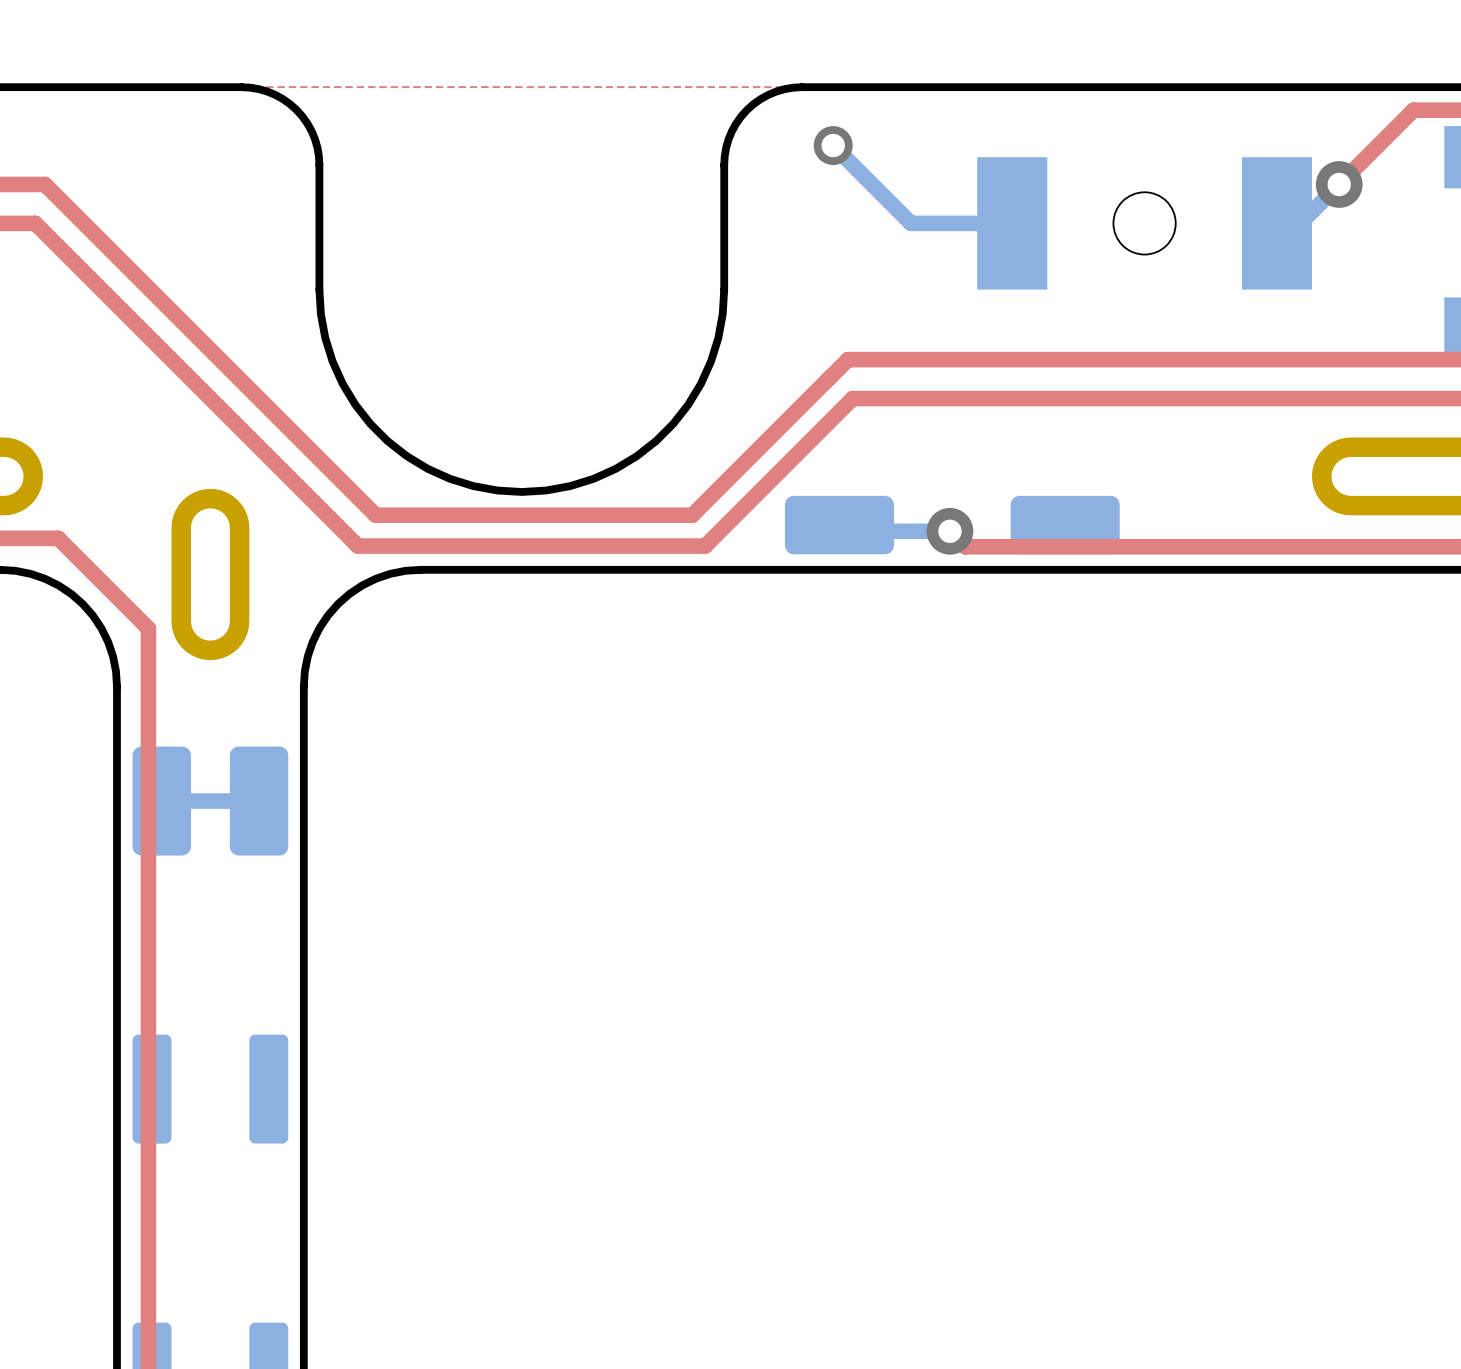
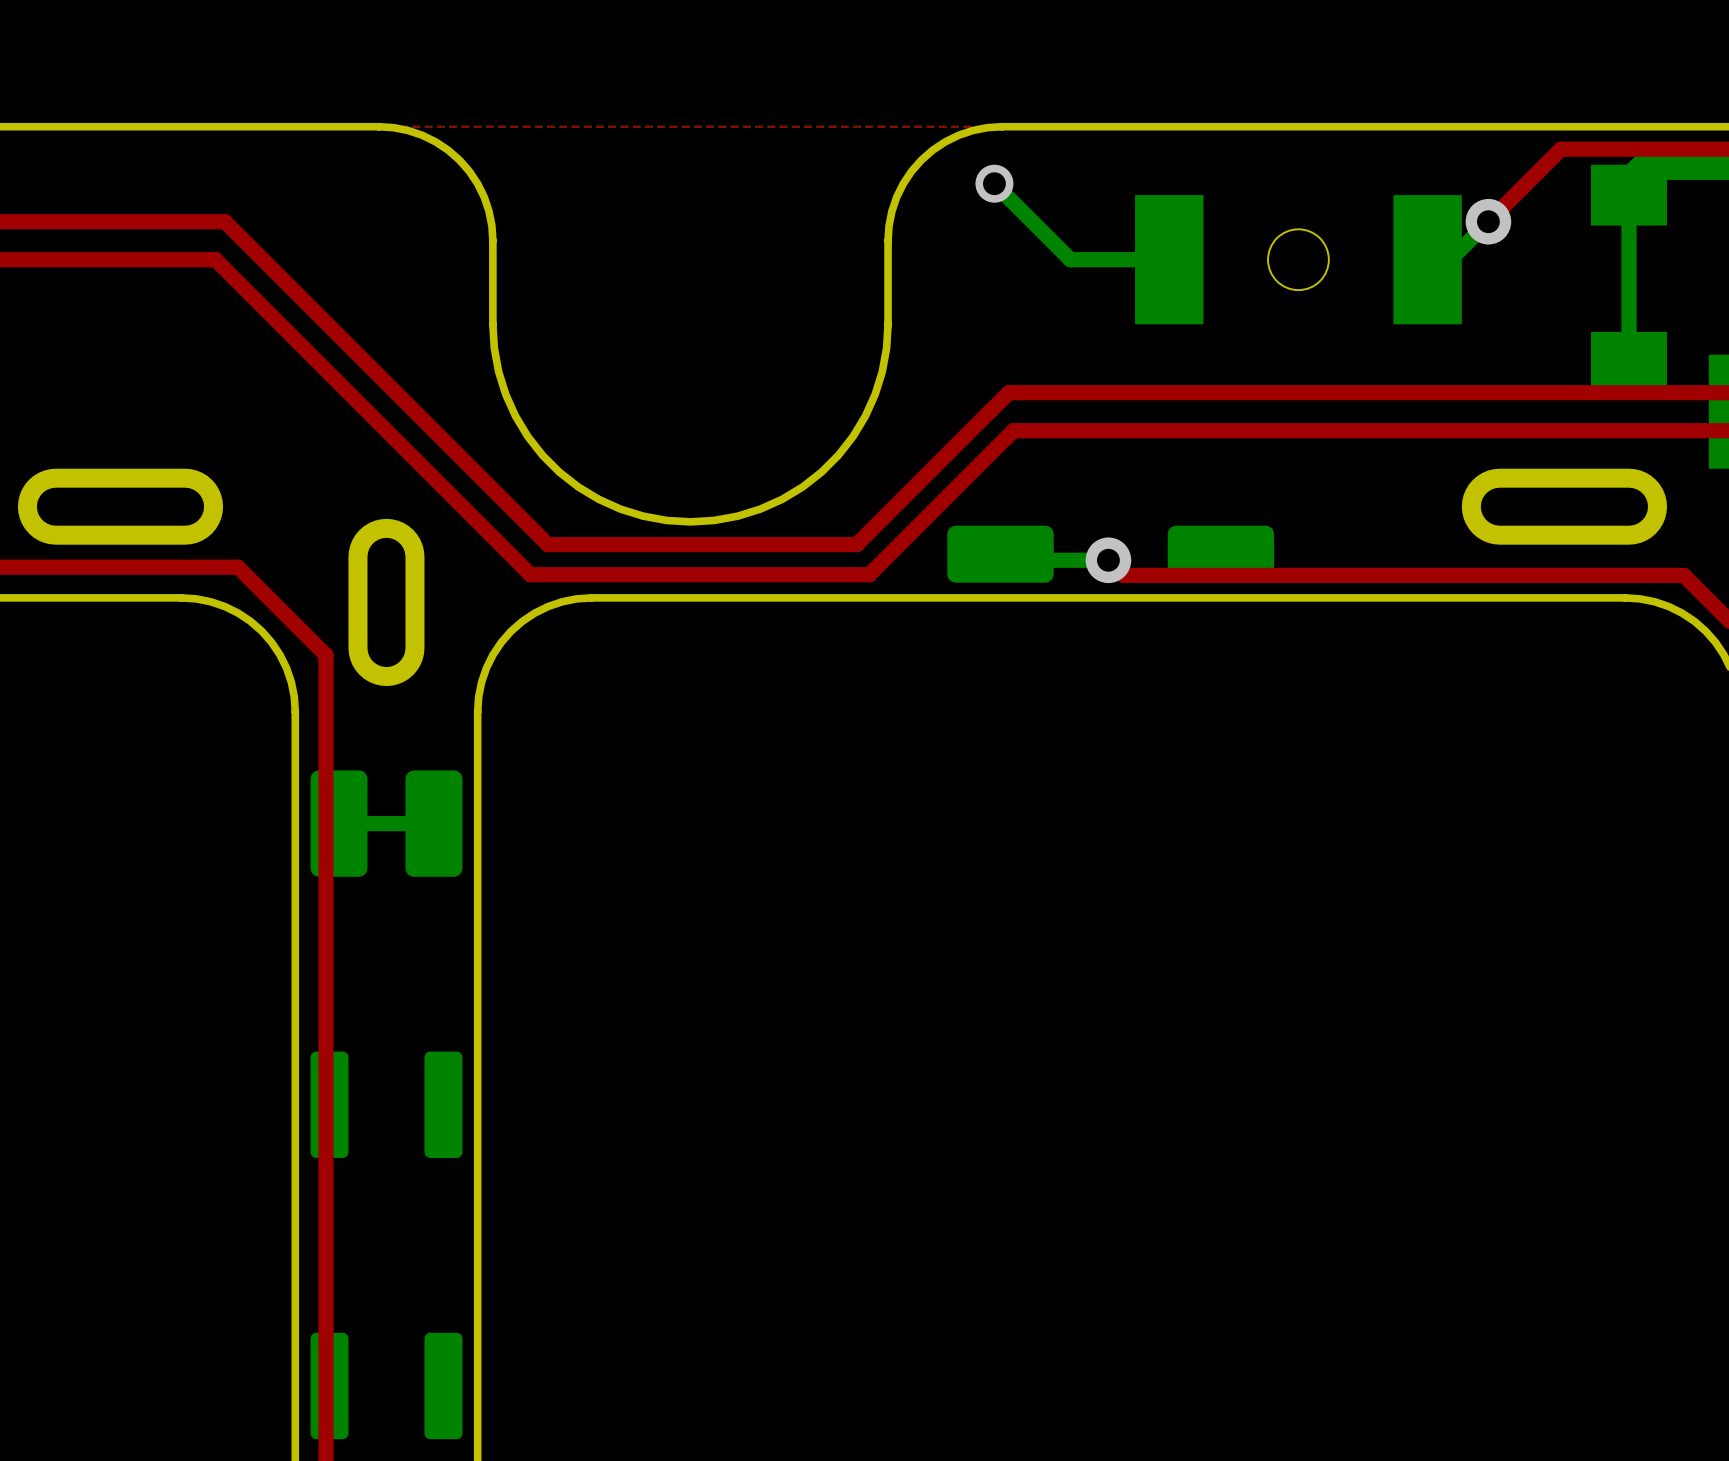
board edge: (202, 87) (258, 89) (282, 99) (296, 109) (307, 123) (317, 147) (319, 203) -> (378, 126) (408, 130) (422, 135) (448, 150) (459, 160) (469, 171) (484, 197) (491, 225) (492, 240)
board edge: (840, 87) (784, 89) (768, 94) (747, 109) (731, 131) (726, 147) (724, 203) -> (1002, 126) (972, 130) (958, 135) (932, 150) (921, 160) (911, 171) (896, 197) (889, 225) (888, 240)

